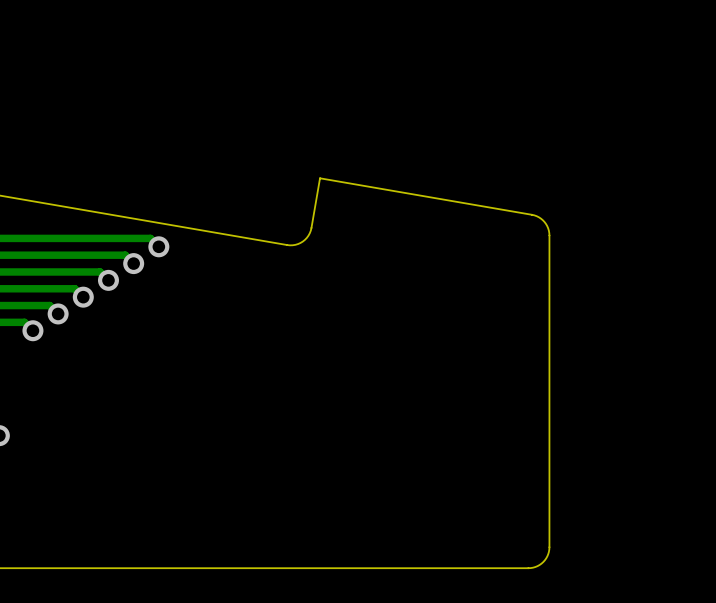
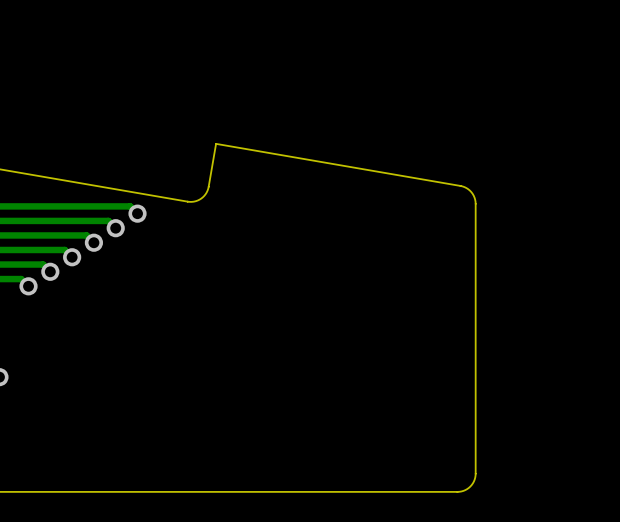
board edge: (320, 178) (310, 230) (306, 237) (300, 242) (287, 245) (216, 232) -> (277, 154) (216, 143) (206, 192) (197, 200) (187, 201)

